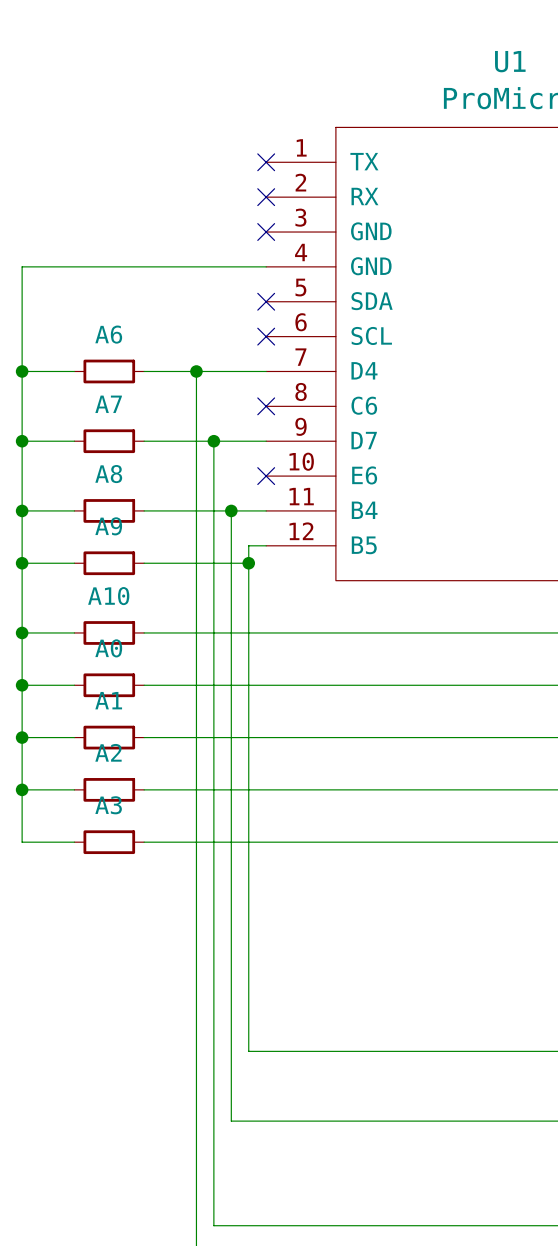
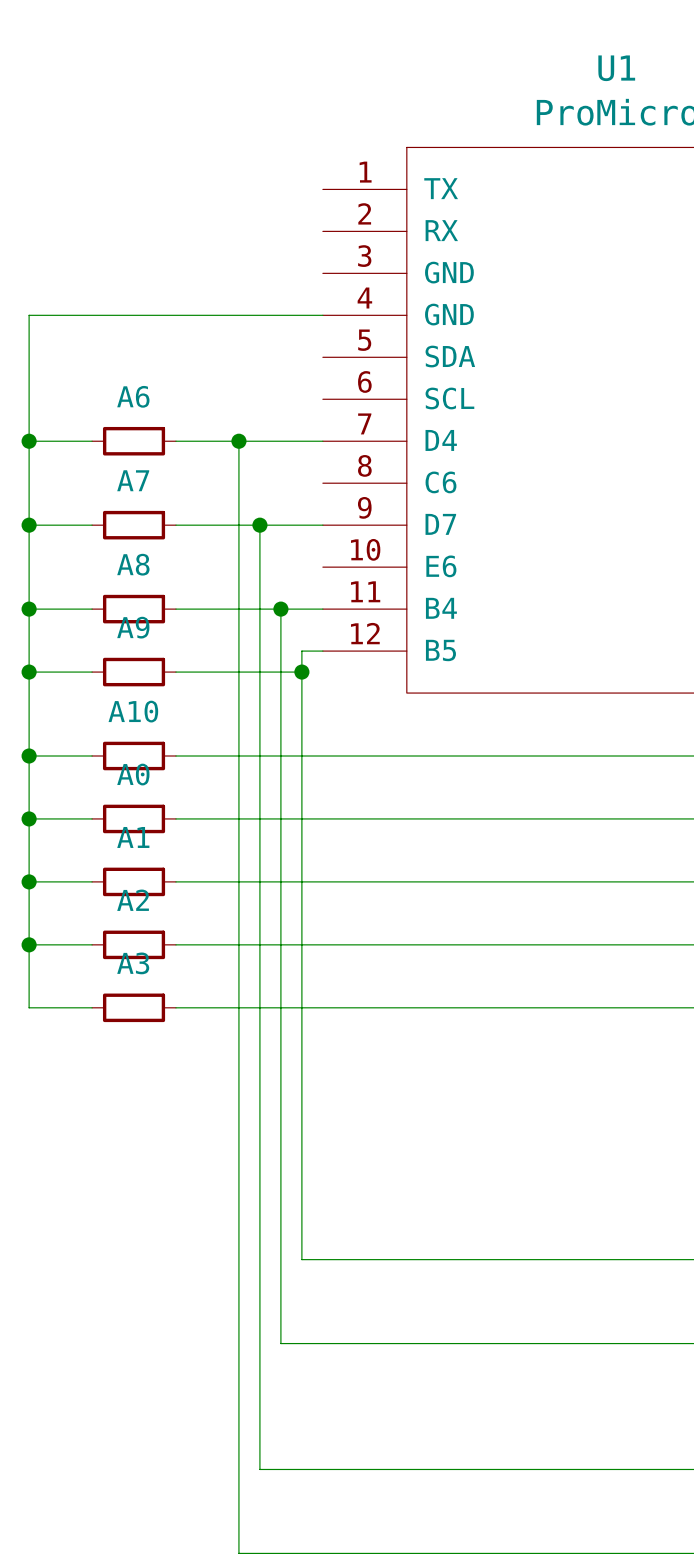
no-connect mark: (266, 162) -> none
no-connect mark: (266, 197) -> none
no-connect mark: (266, 232) -> none
no-connect mark: (266, 301) -> none
no-connect mark: (266, 336) -> none
no-connect mark: (266, 406) -> none
no-connect mark: (266, 476) -> none

